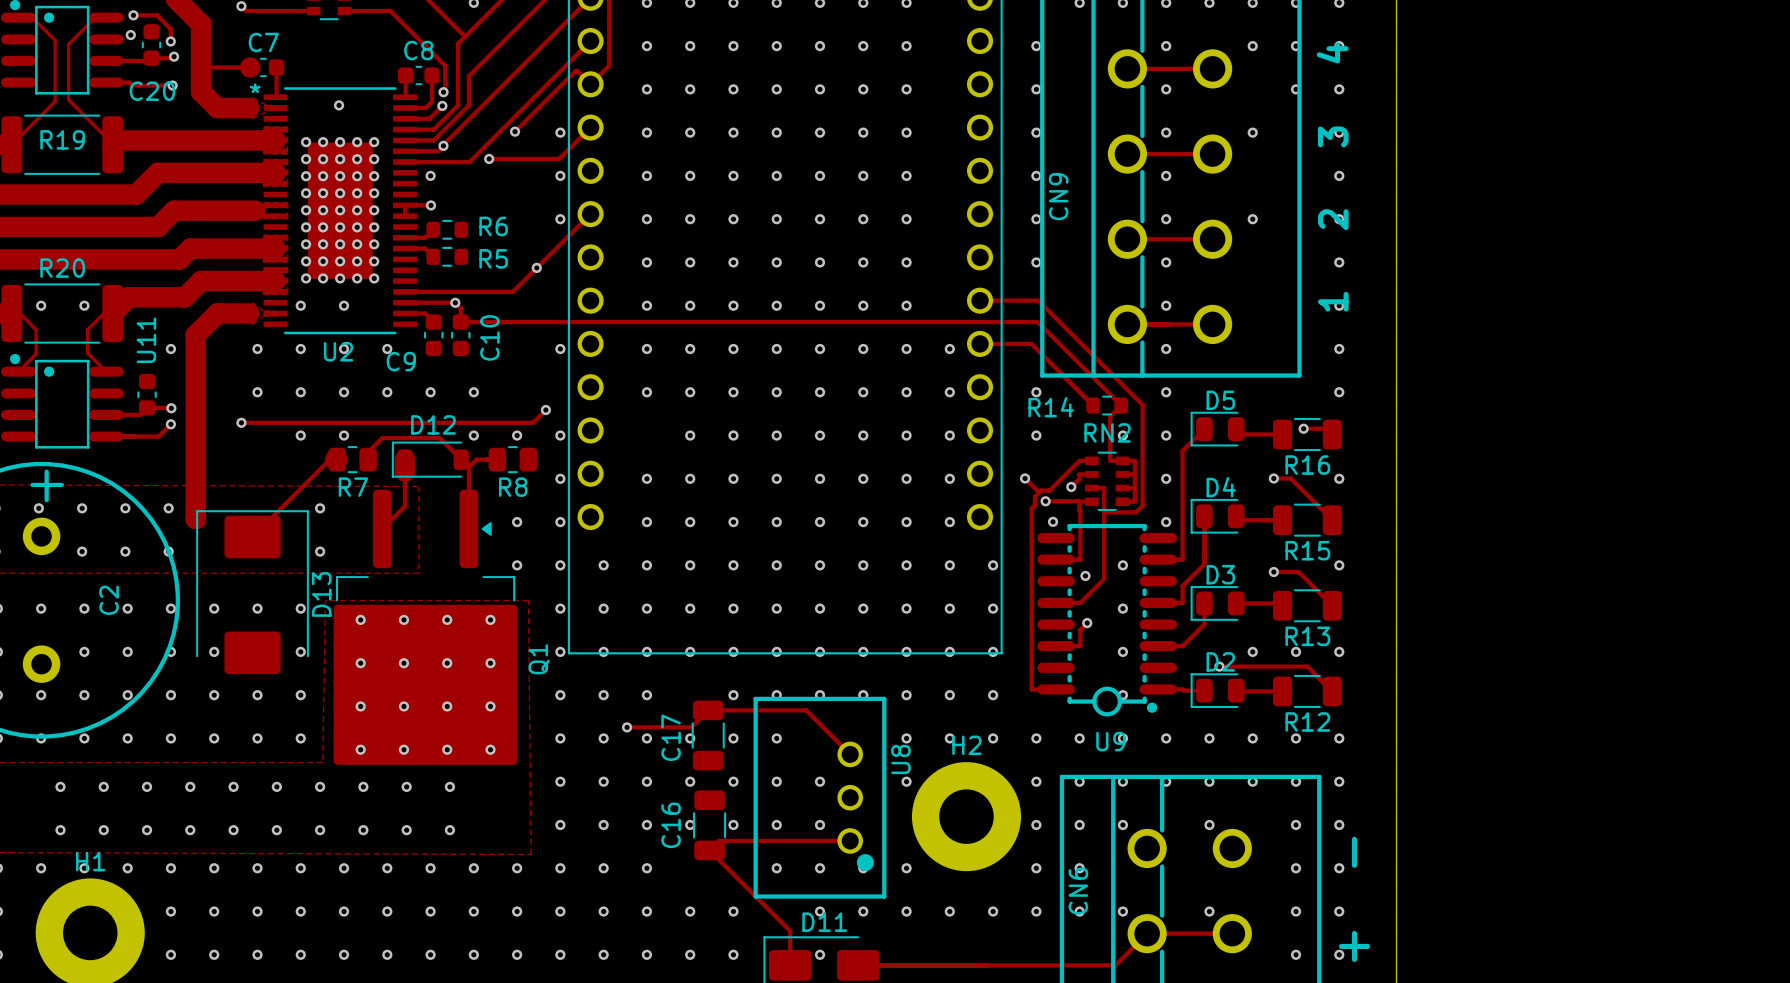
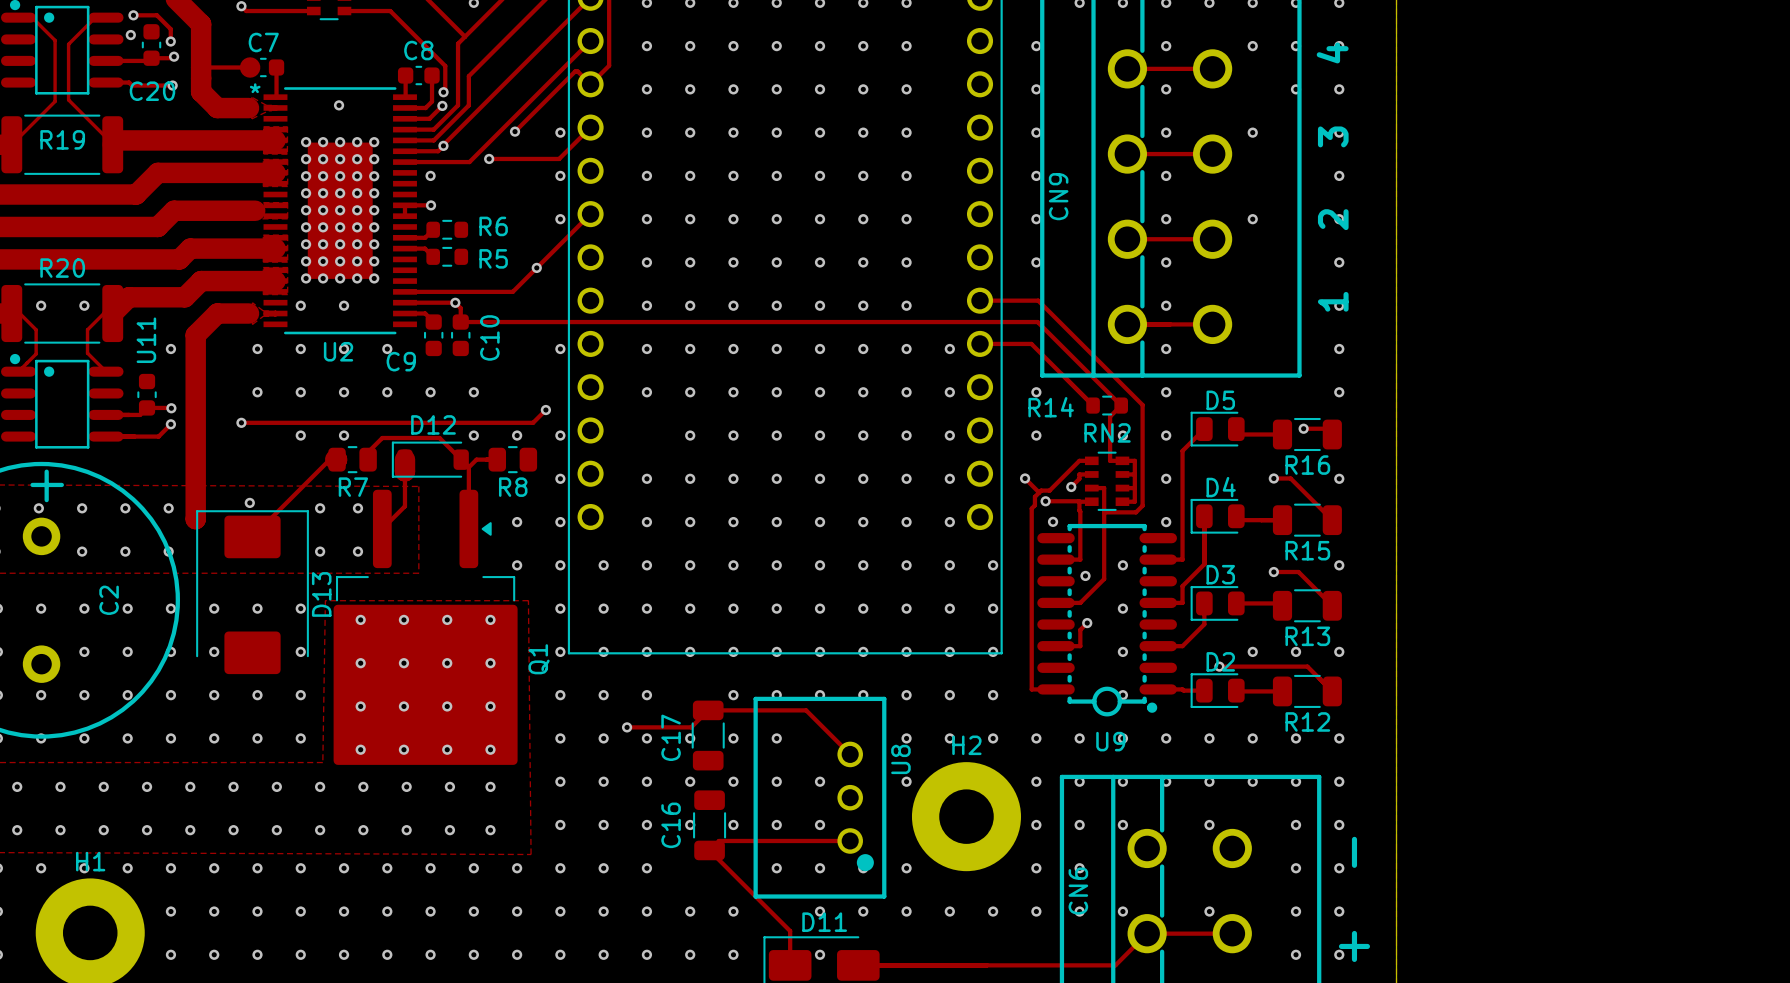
via: none -> (249, 502)
via: none -> (357, 508)
via: none -> (357, 551)
via: none -> (17, 786)
via: none -> (490, 786)
via: none -> (17, 830)
via: none -> (490, 830)

